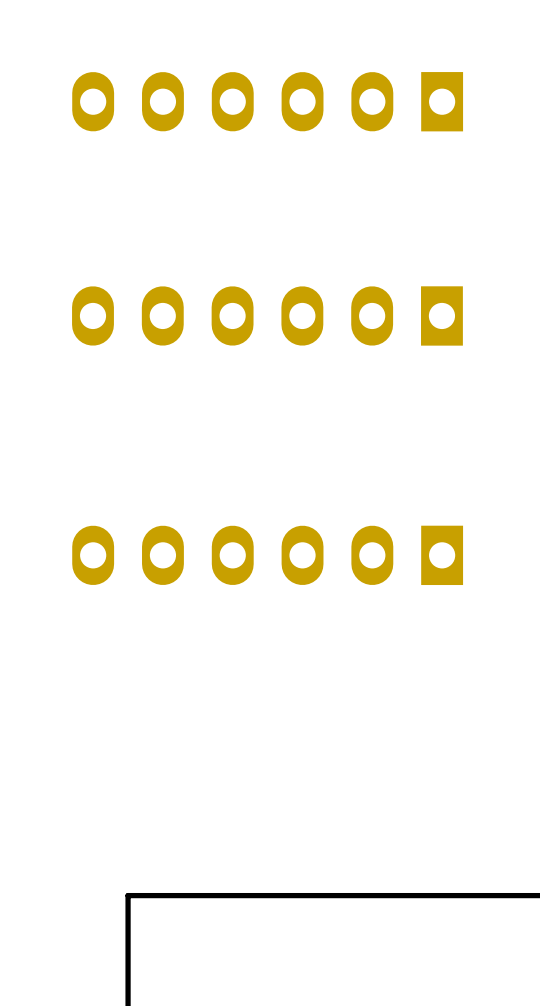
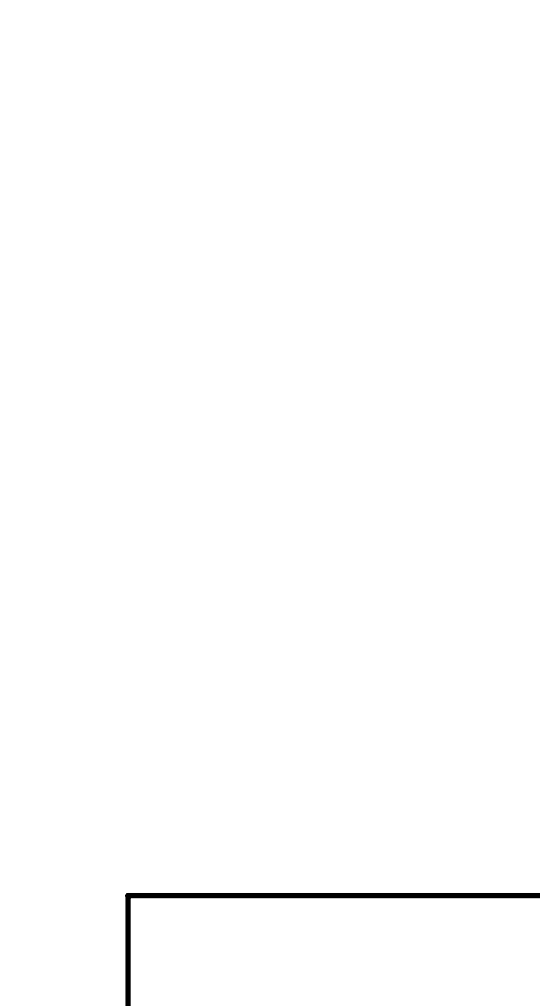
part: (267, 101) -> none
part: (267, 315) -> none
part: (267, 555) -> none

